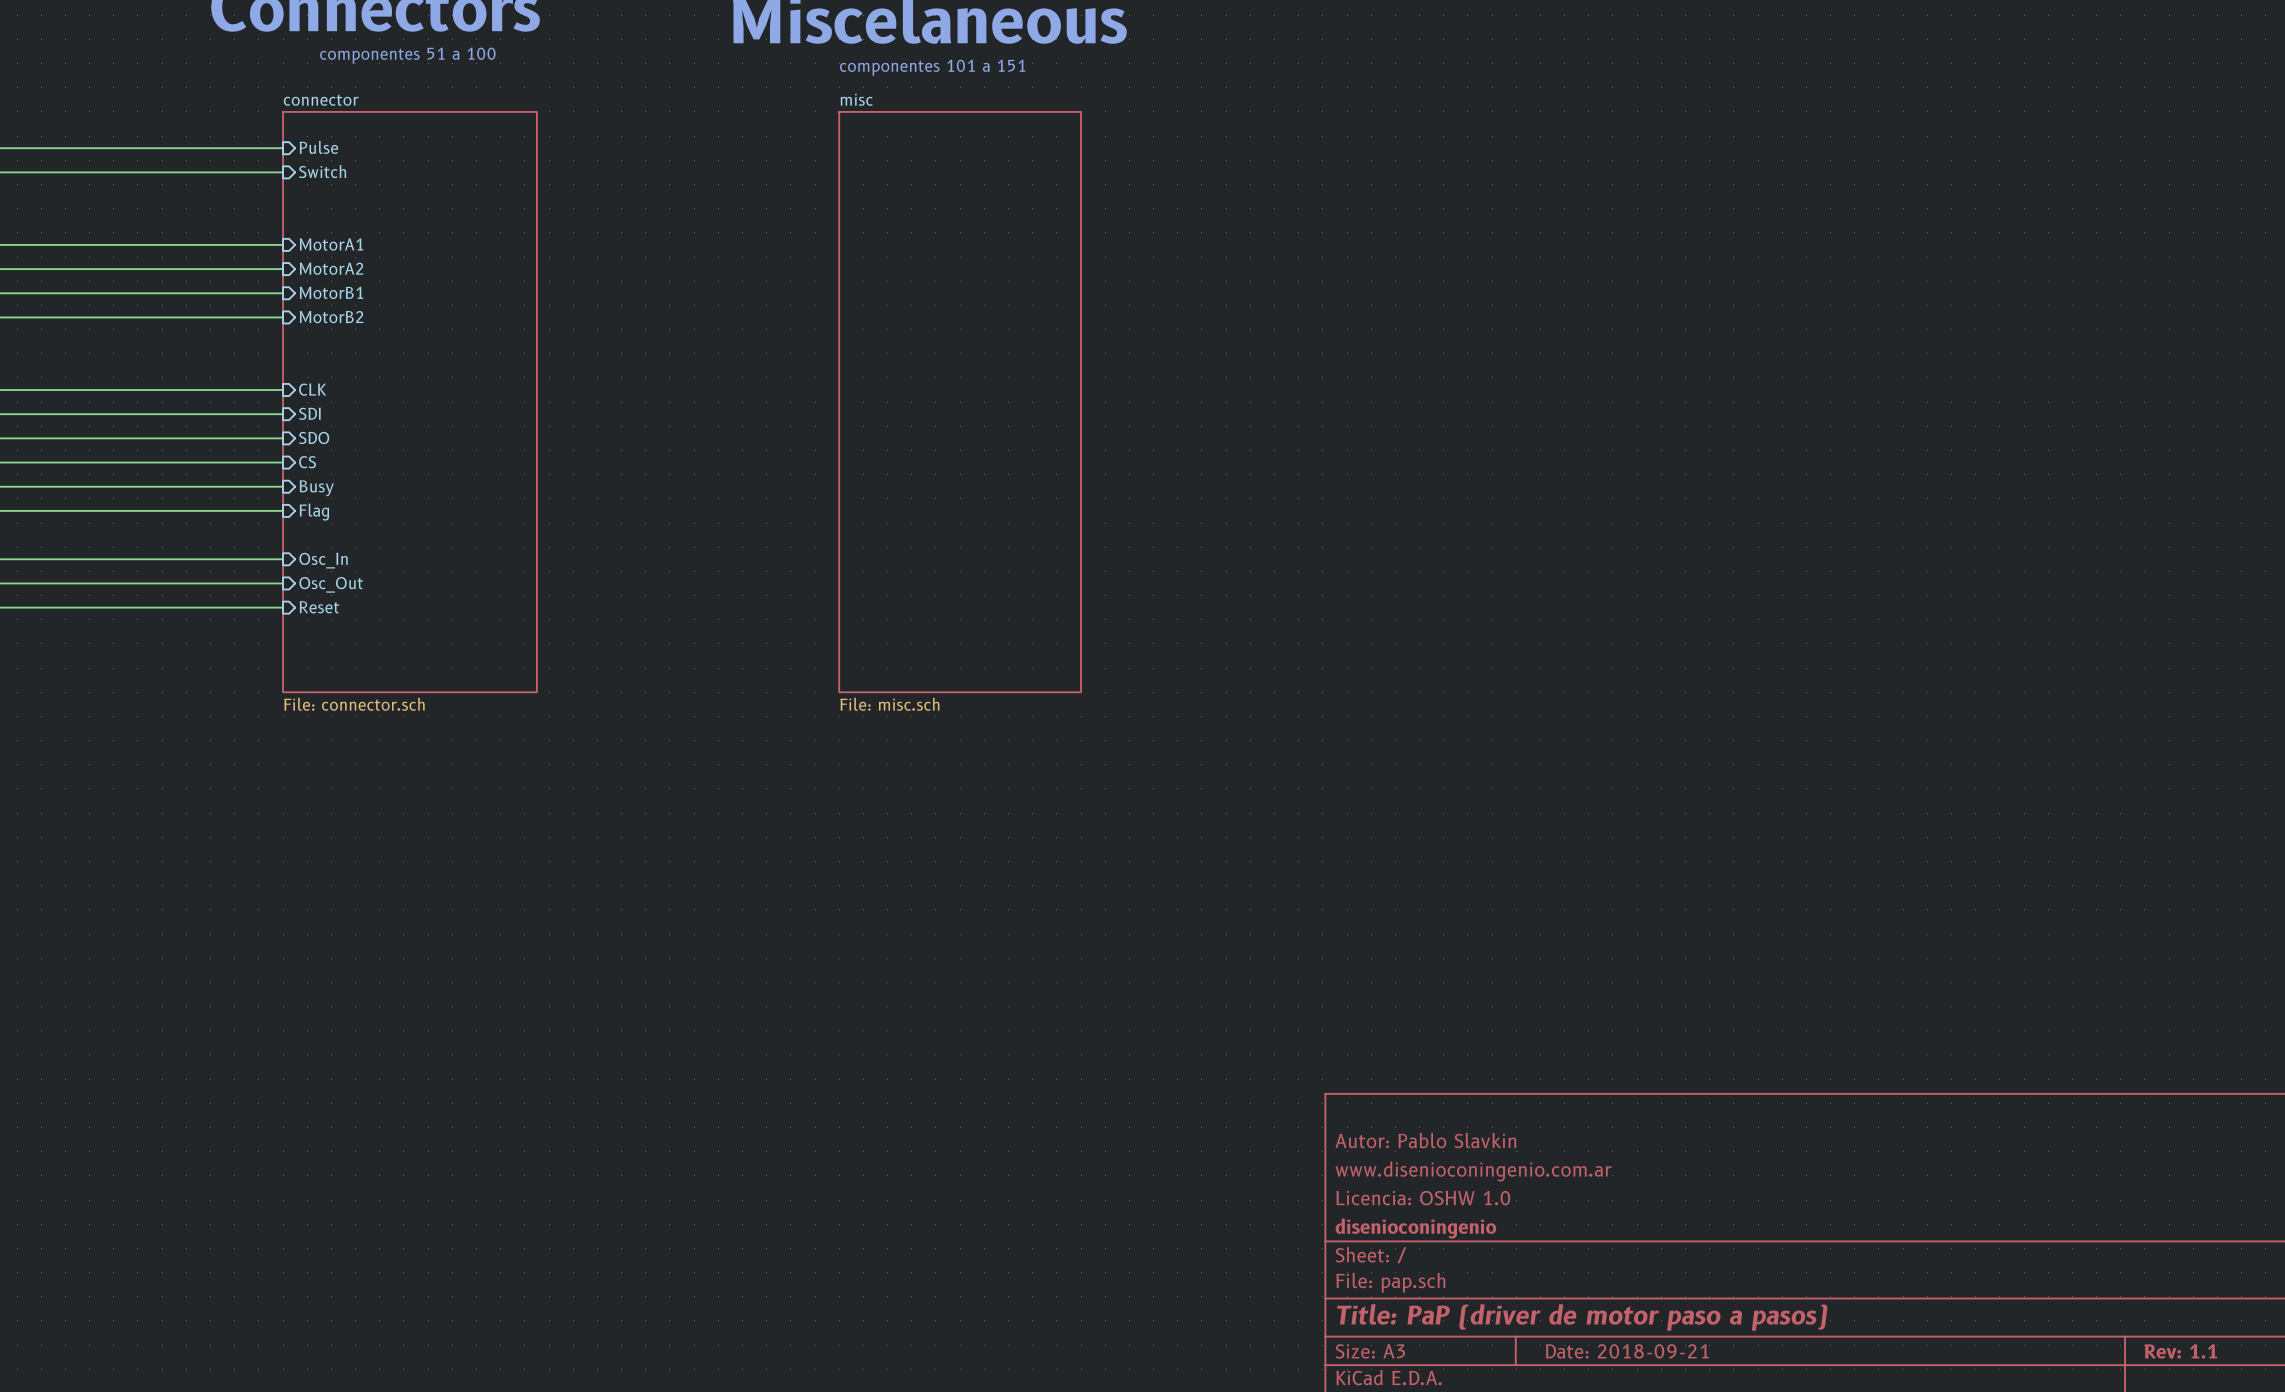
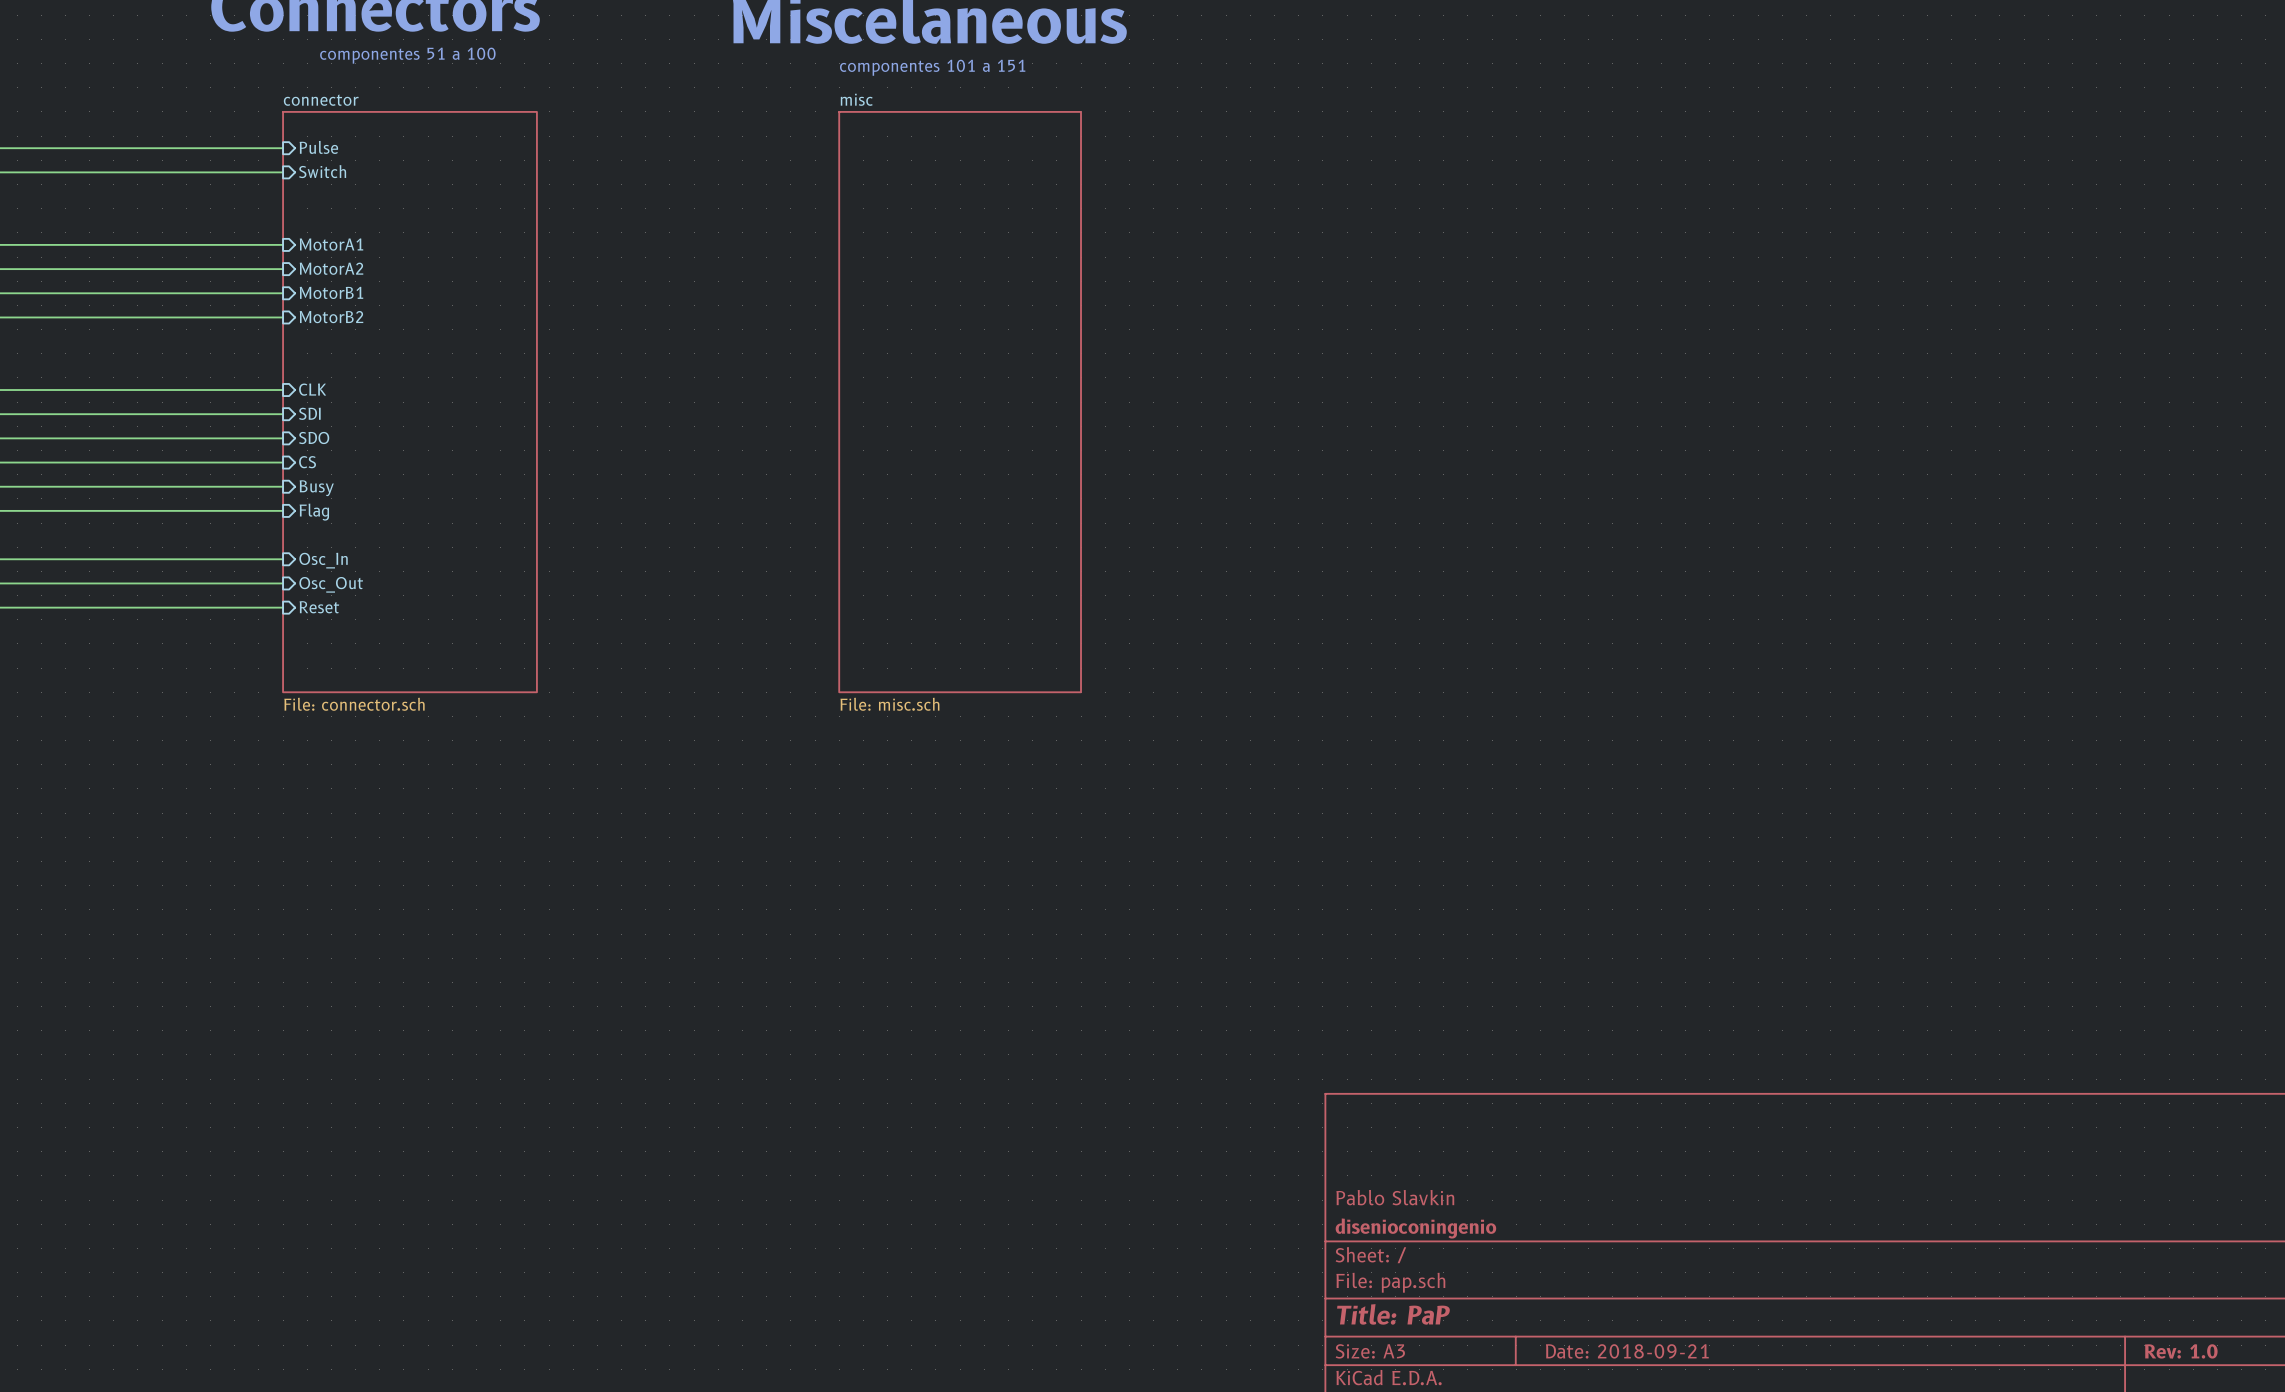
title block: Autor: Pablo Slavkin (1425, 1140) -> none
title block: www.disenioconingenio.com.ar (1473, 1171) -> none
title block: Licencia: OSHW 1.0 (1423, 1198) -> Pablo Slavkin (1395, 1197)
title block: Title: PaP (driver de motor paso a pasos) (1582, 1317) -> Title: PaP (1393, 1314)
title block: Rev: 1.1 (2180, 1351) -> Rev: 1.0 (2181, 1351)

